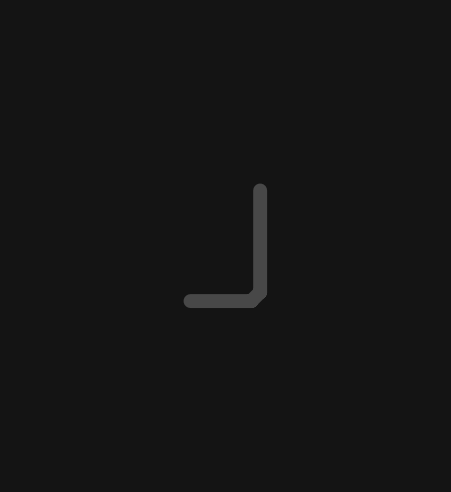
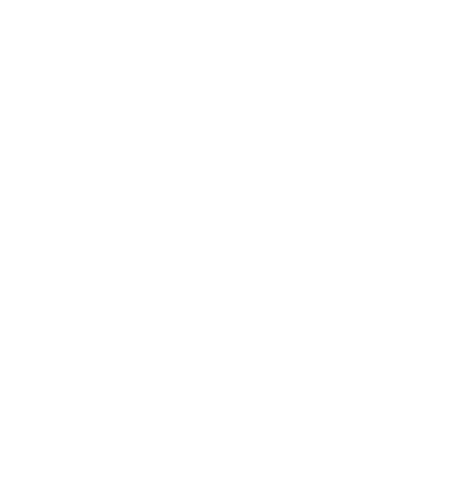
track: (260, 190) (260, 292) (251, 301) (190, 301) -> none

